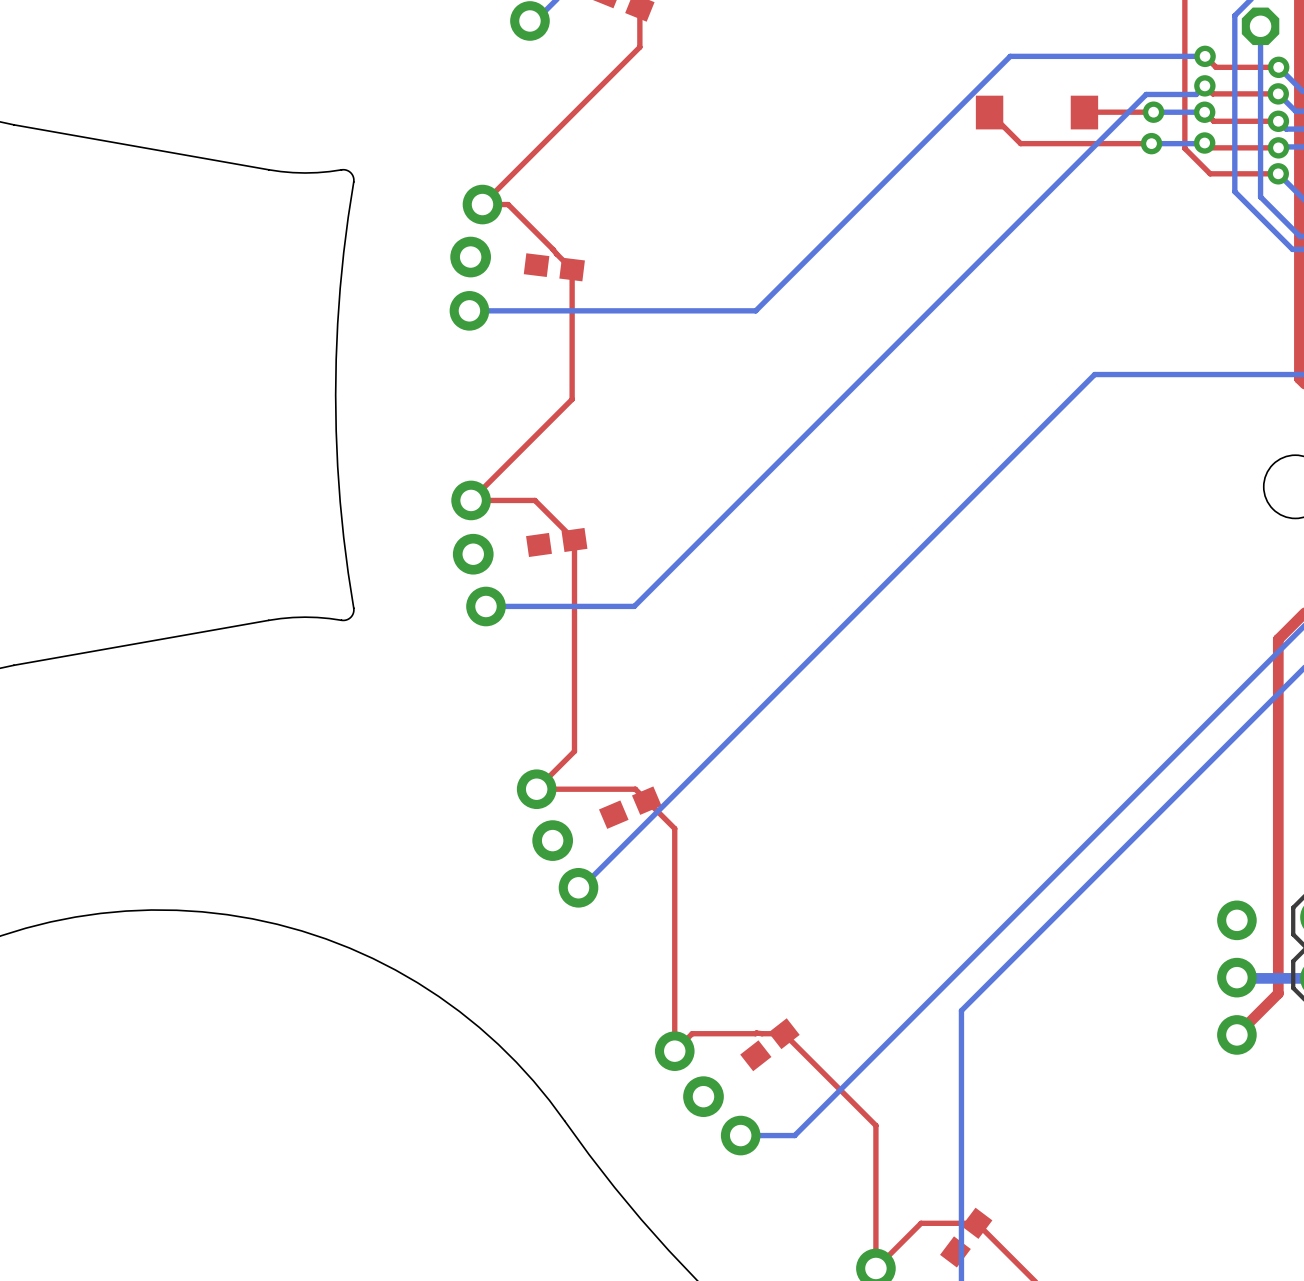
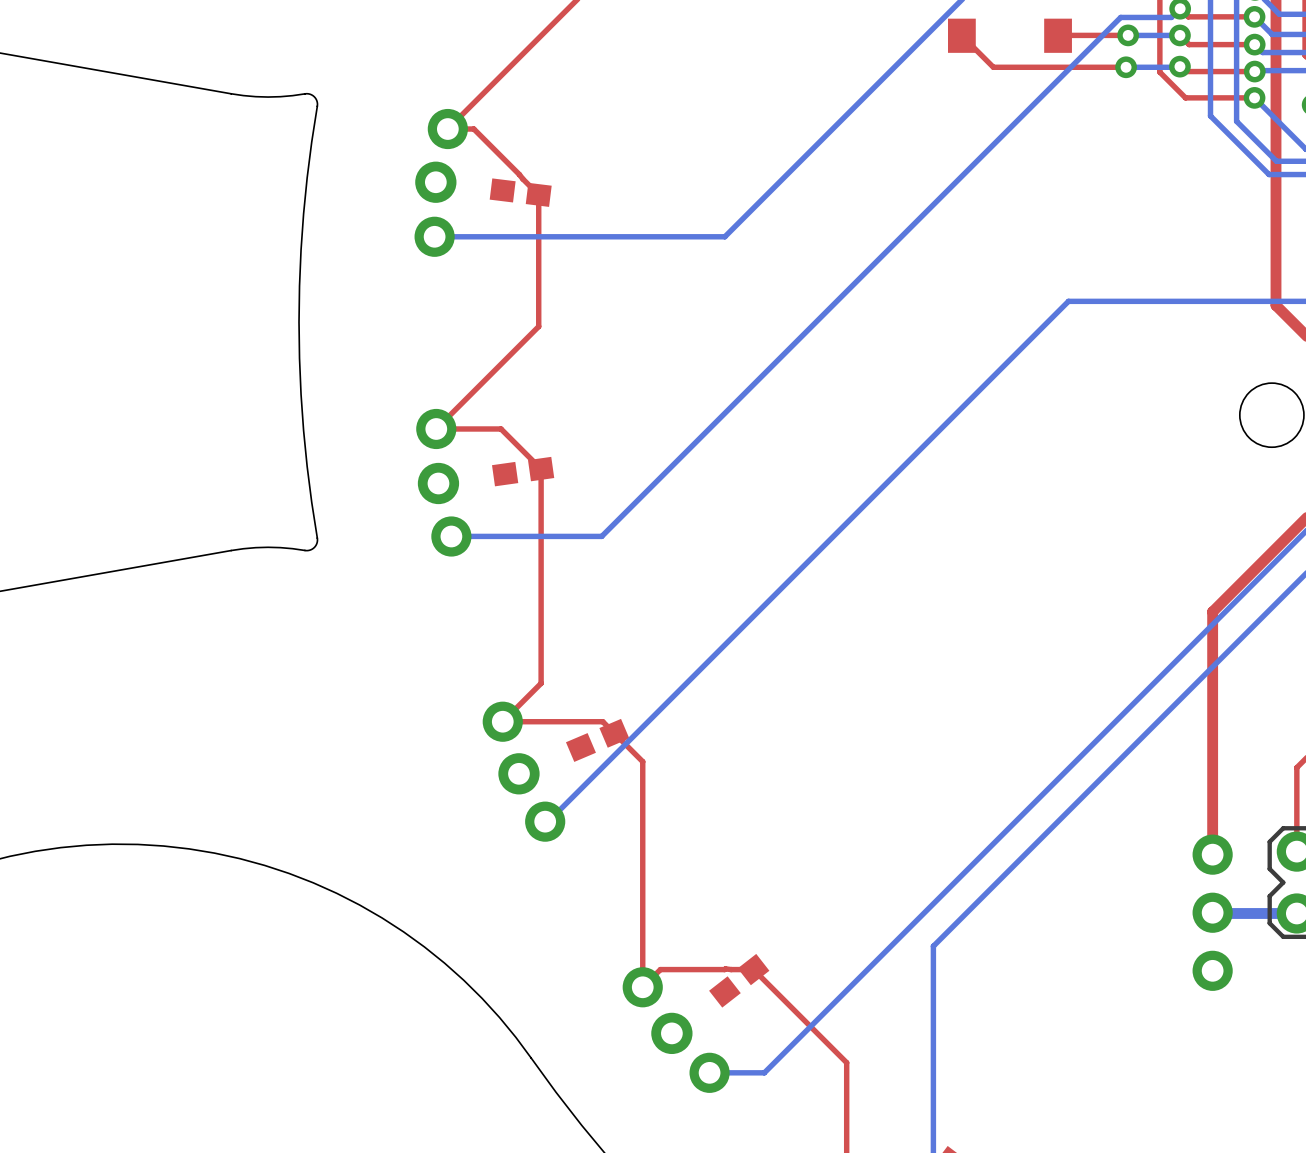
top track: (1278, 639) (1278, 993) (1236, 1034) -> (1254, 569) (1212, 611) (1212, 854)

